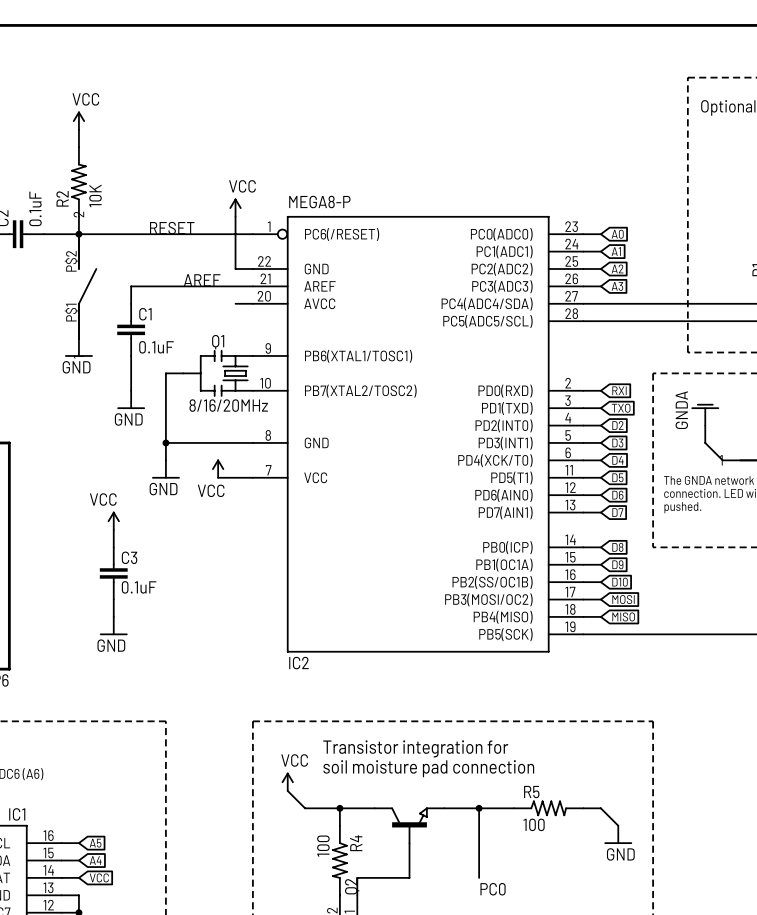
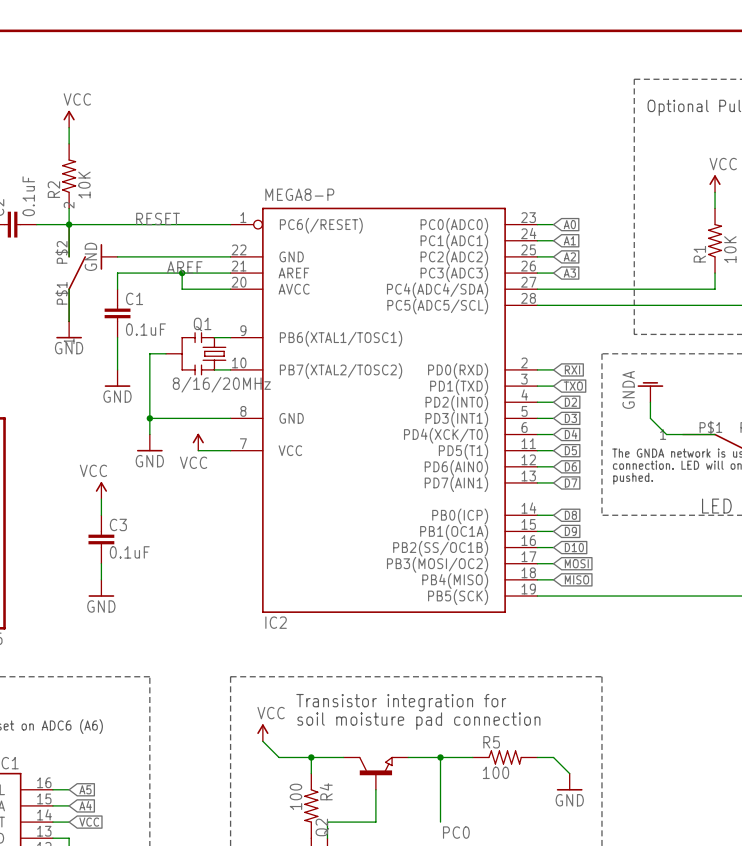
power symbol: VCC (235, 207) -> none
wire: (235, 216) (235, 269) -> (117, 256) (214, 256)
power symbol: none -> GND (109, 256)
wire: none -> (182, 273) (182, 289) (214, 289)
junction: none -> (182, 273)

